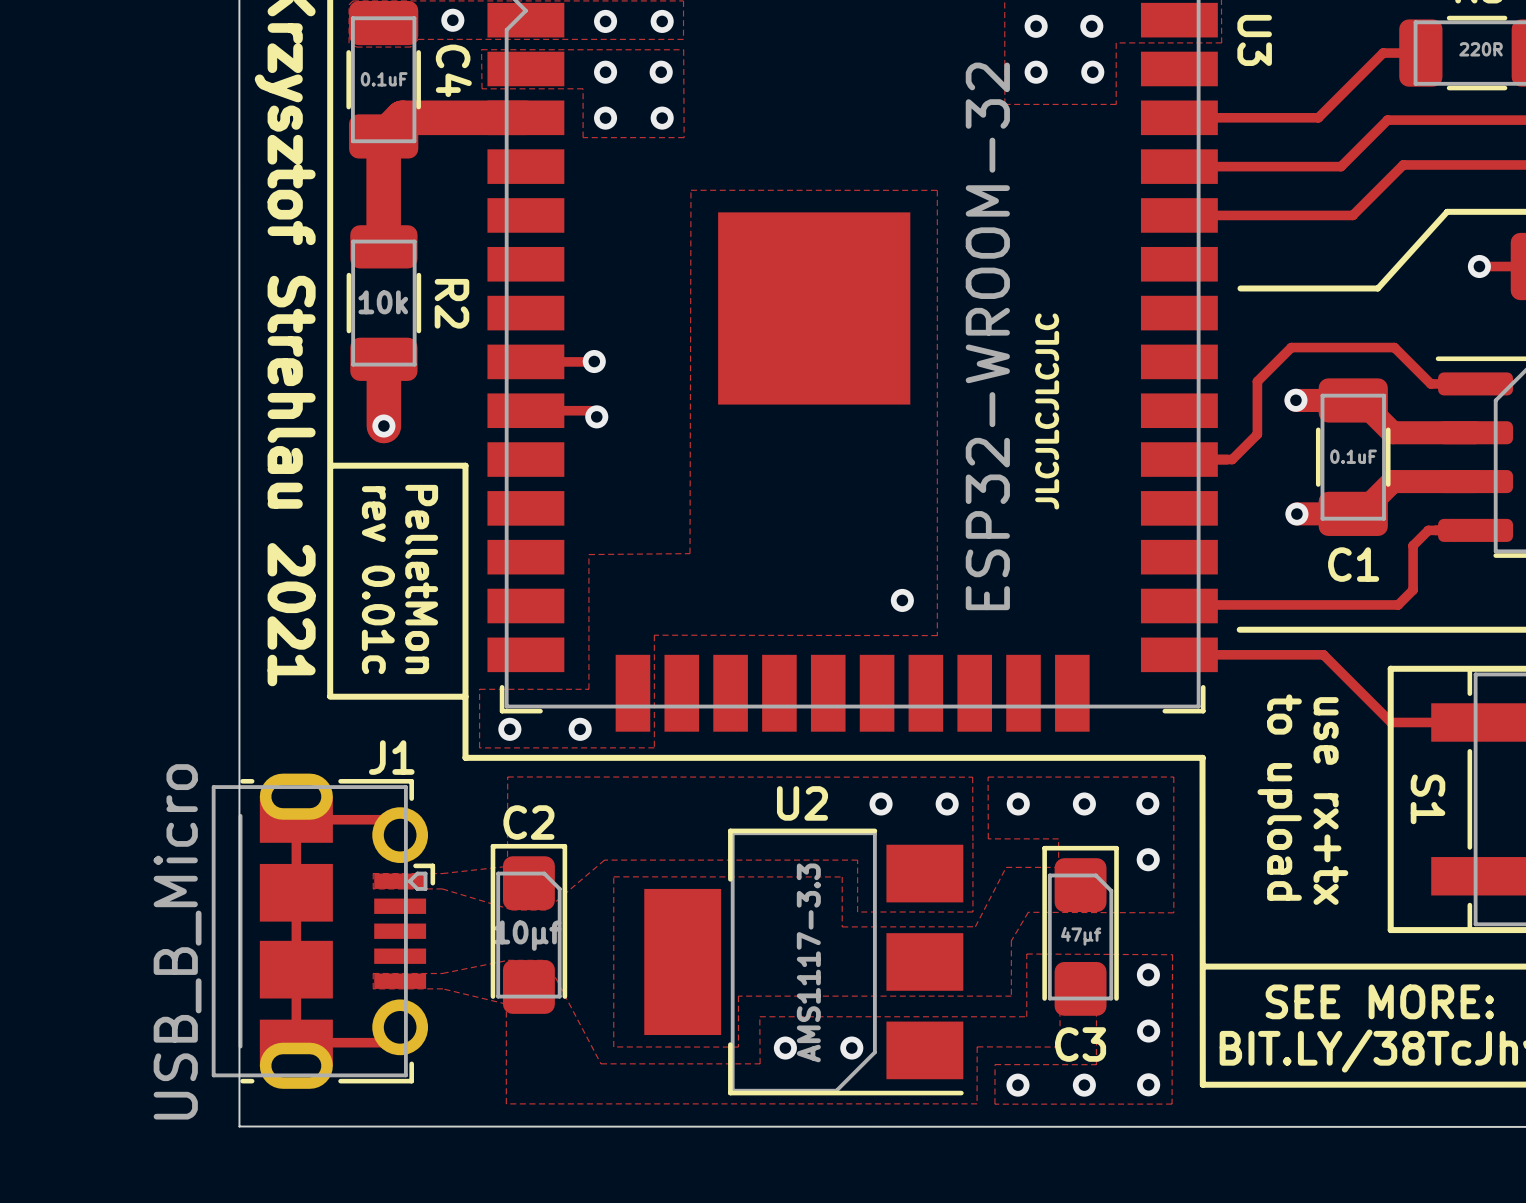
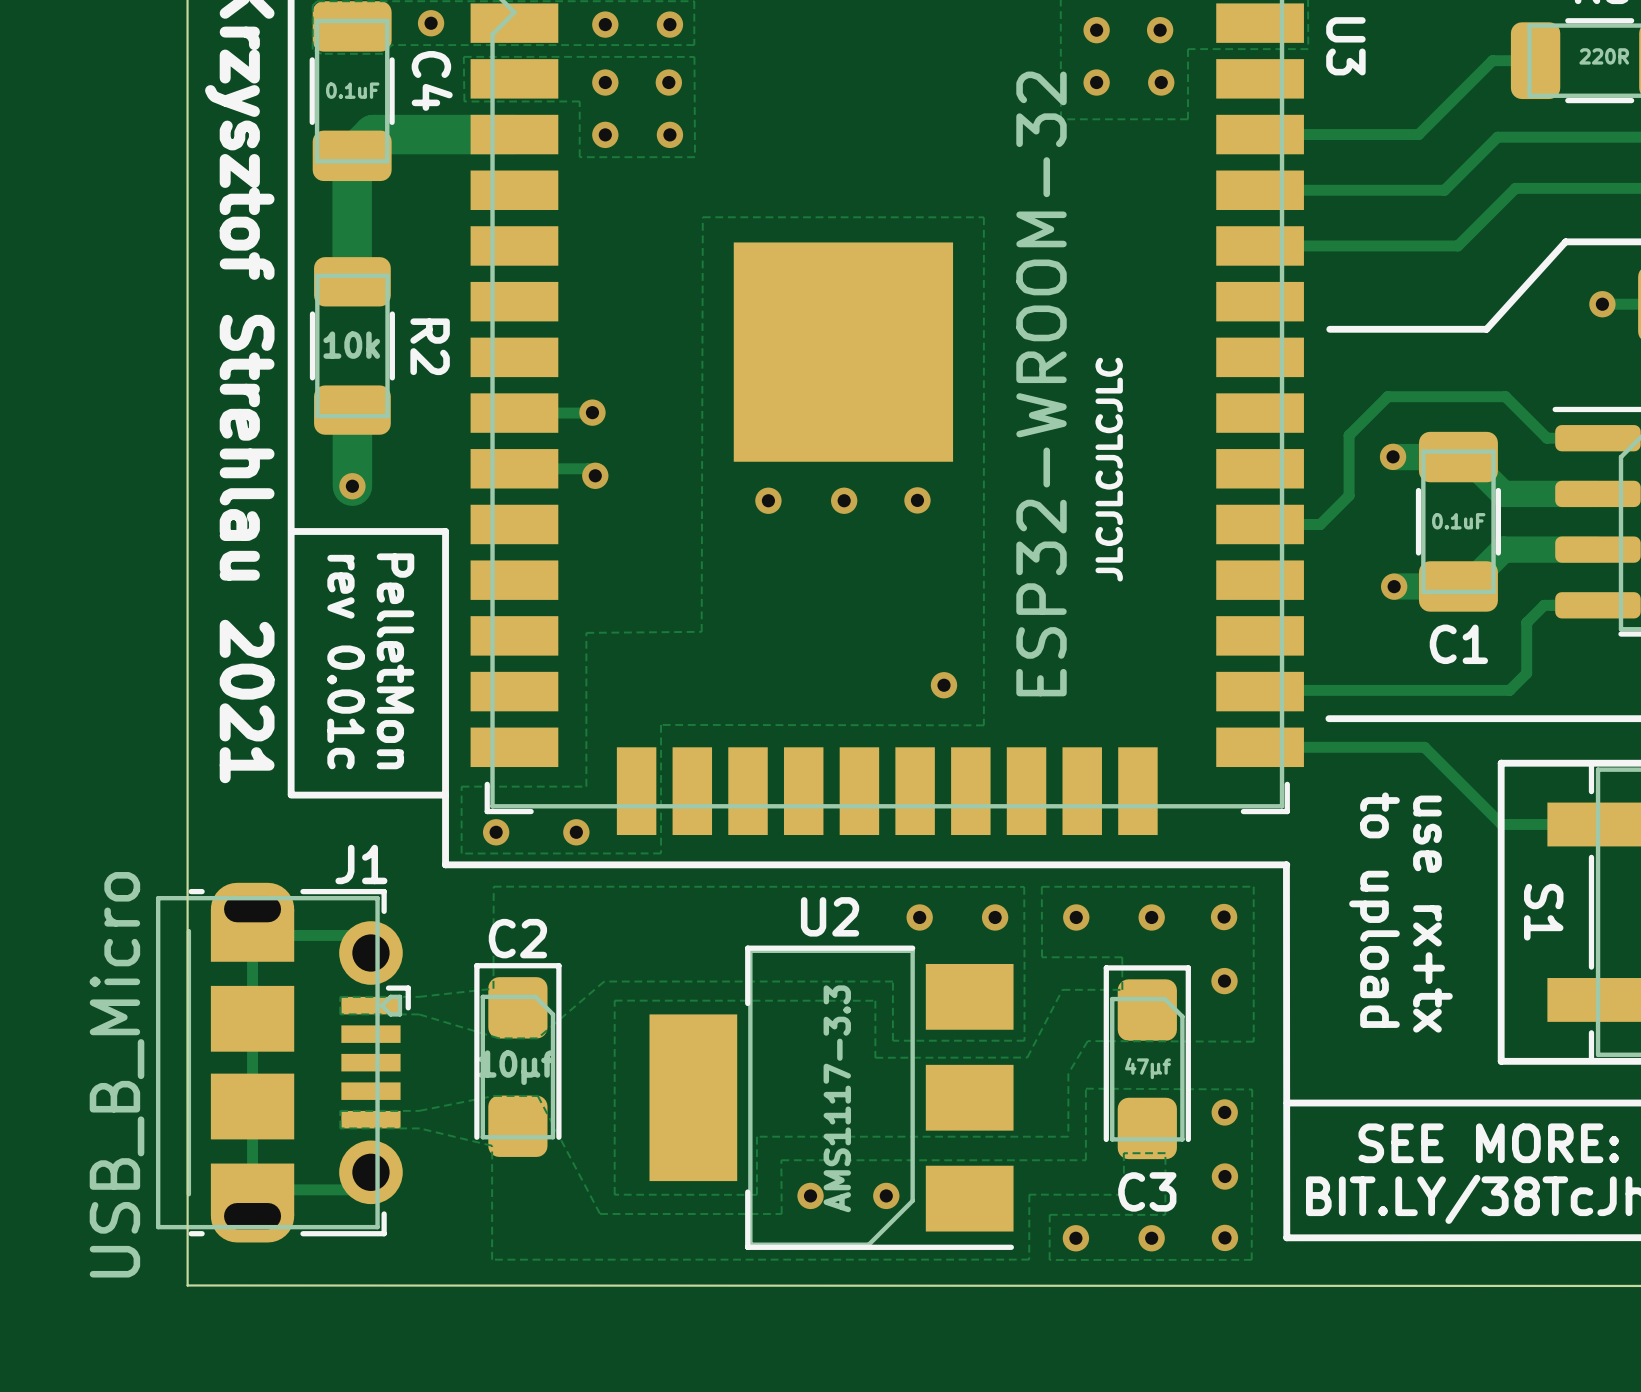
via: none -> (768, 500)
via: none -> (844, 500)
via: none -> (917, 500)

